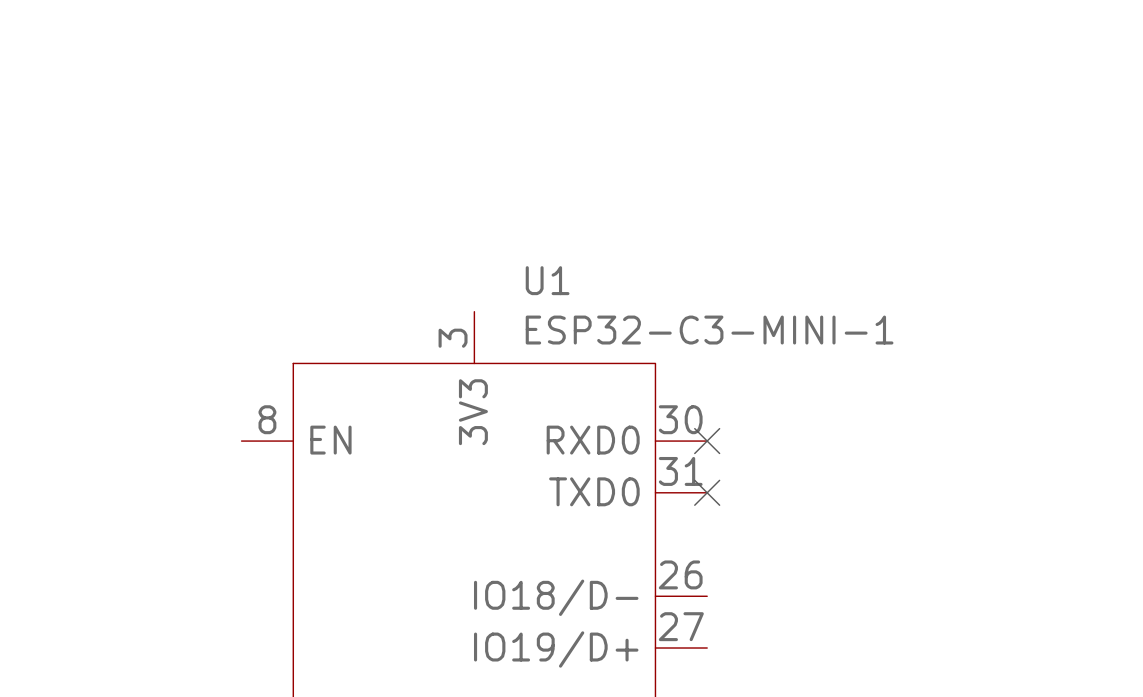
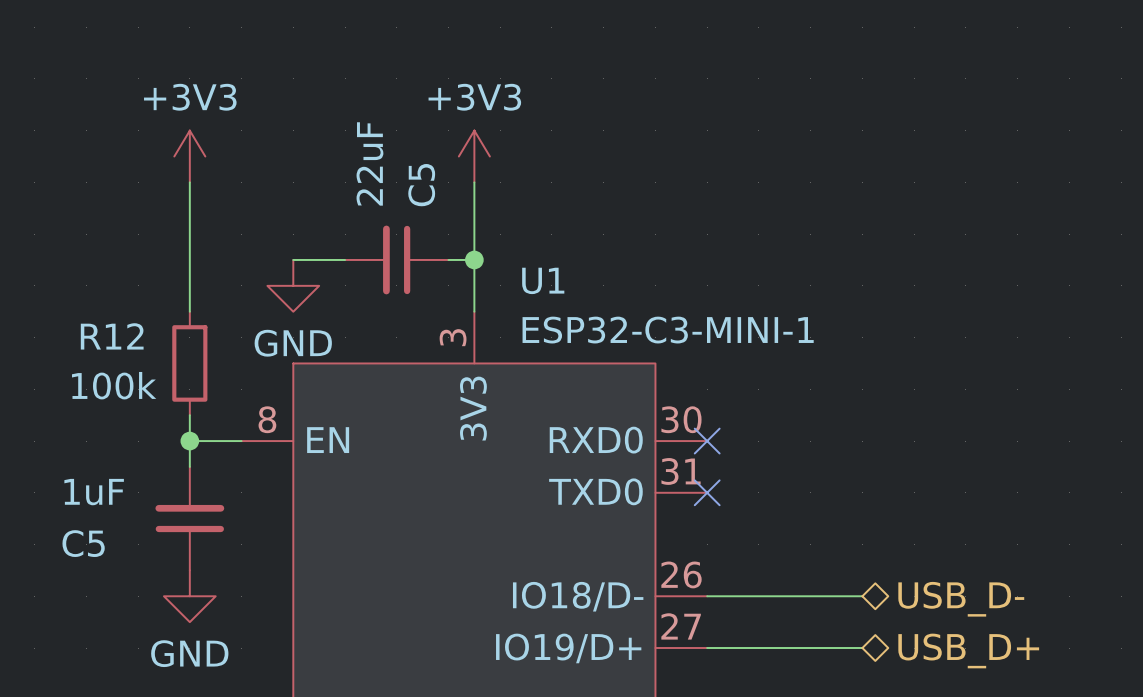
power symbol: none -> +3V3 (189, 156)
power symbol: none -> +3V3 (474, 156)
wire: none -> (189, 182) (189, 311)
wire: none -> (474, 182) (474, 311)
wire: none -> (293, 259) (345, 259)
C5: none -> 22uF (396, 259)
wire: none -> (448, 259) (474, 259)
junction: none -> (474, 259)
power symbol: none -> GND (293, 285)
R12: none -> 100k (189, 363)
wire: none -> (189, 415) (189, 466)
wire: none -> (189, 441) (241, 441)
junction: none -> (189, 441)
C5: none -> 1uF (189, 518)
power symbol: none -> GND (189, 596)
wire: none -> (707, 596) (862, 596)
hierarchical label: none -> USB_D- (961, 599)
wire: none -> (707, 648) (862, 648)
hierarchical label: none -> USB_D+ (968, 650)

